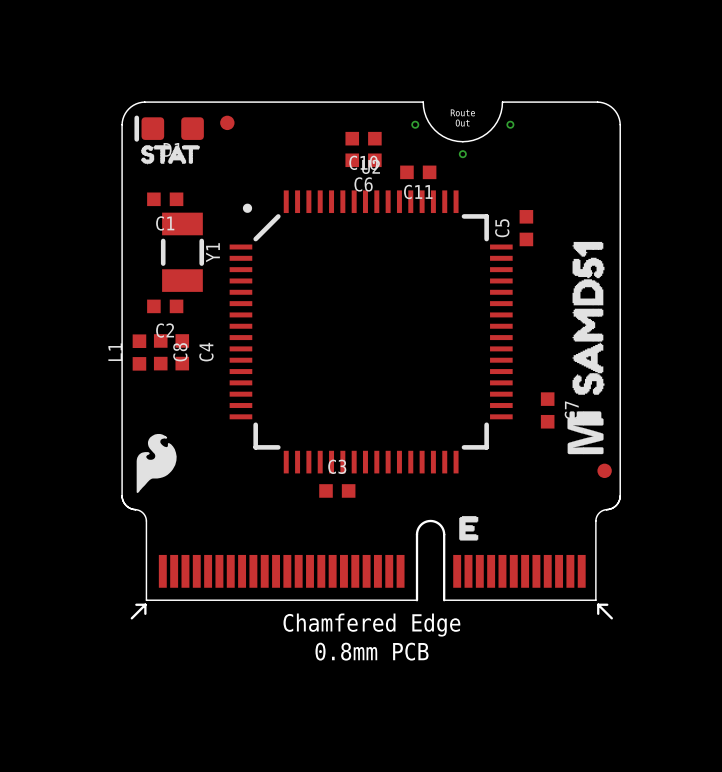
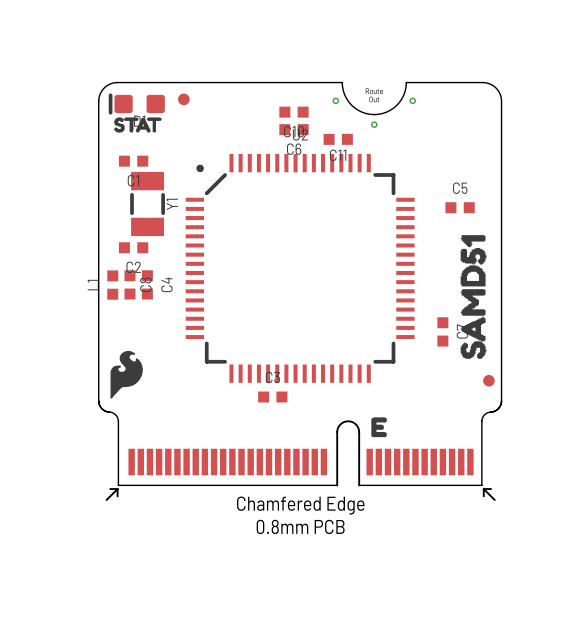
C5 rotation: 0° (526, 228) -> 90° clockwise (460, 207)
C5 position: (526, 228) -> (460, 207)
drawing position: (588, 318) -> (473, 296)
drawing: [567, 411, 604, 455] -> none

